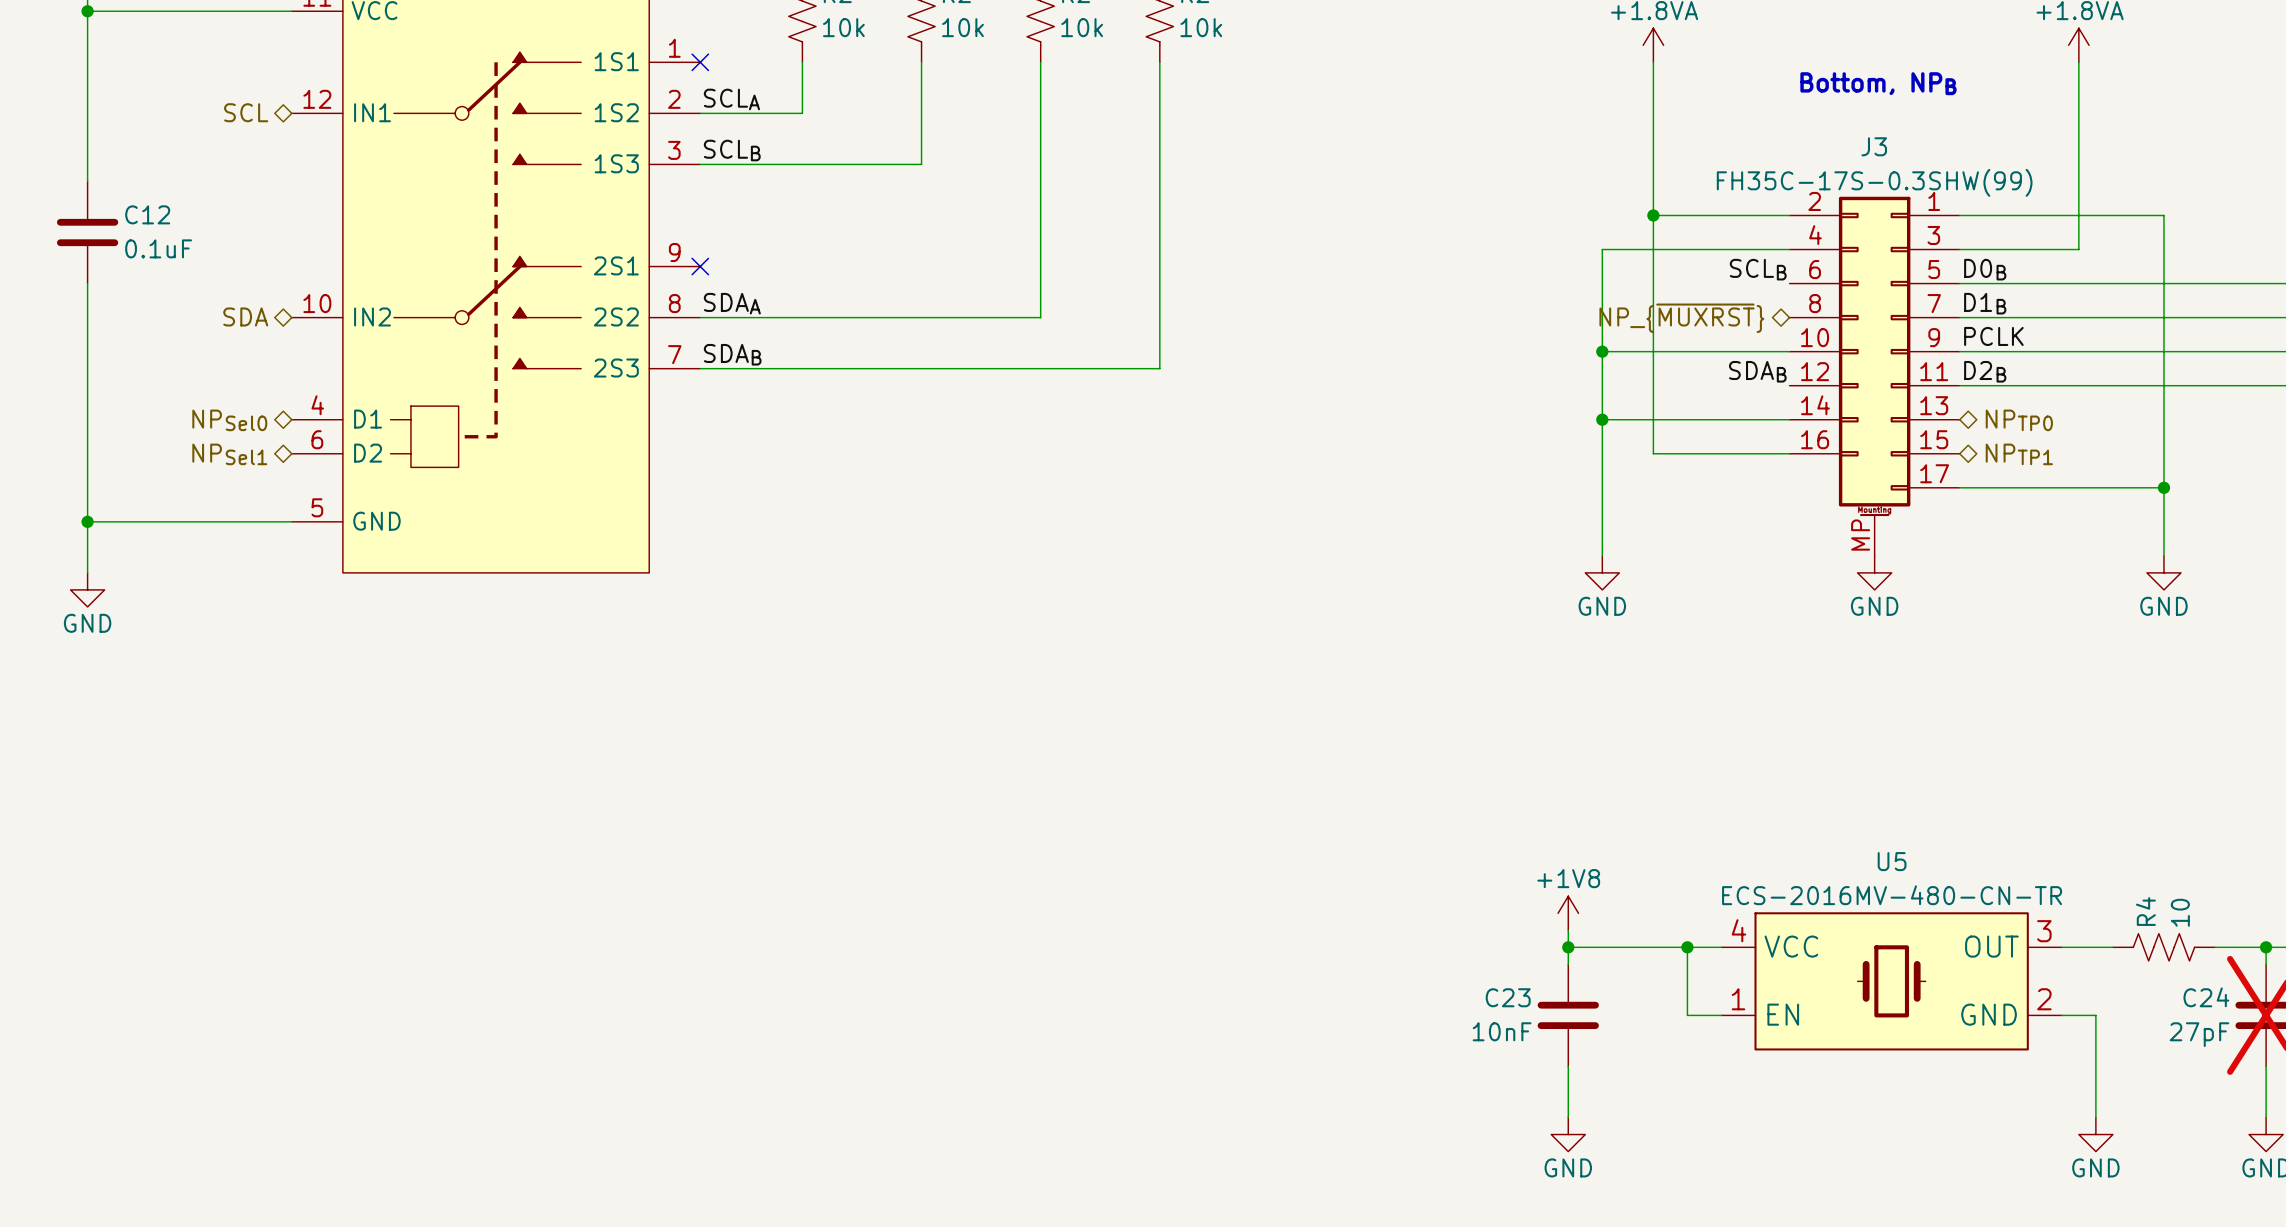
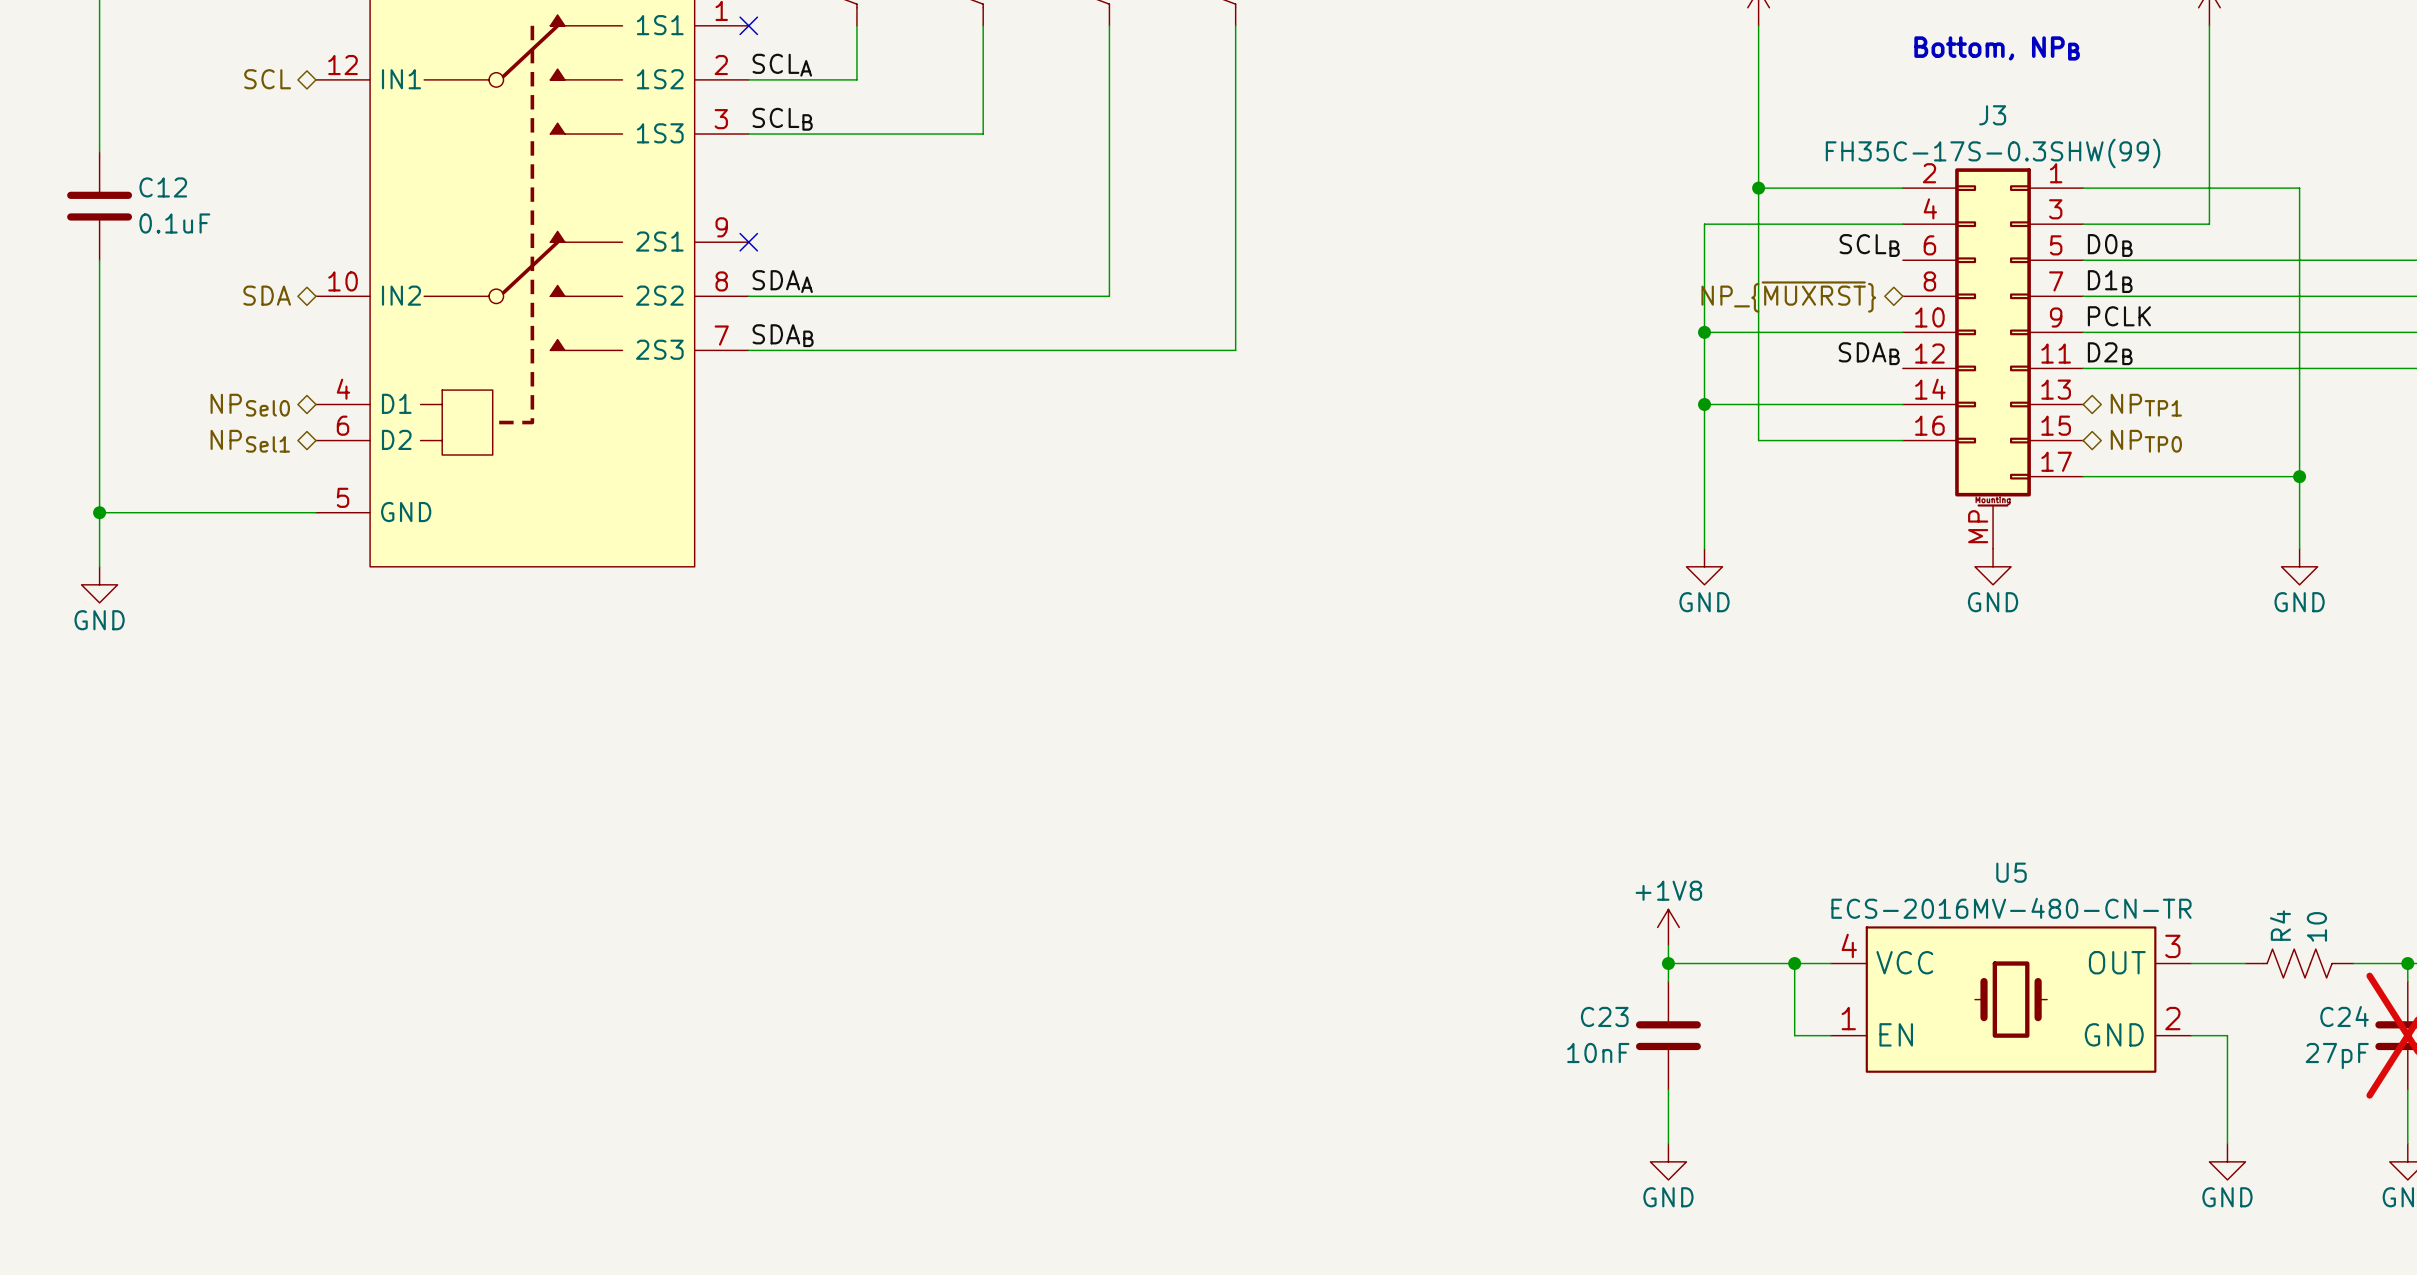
hierarchical label: NPTP0 (2019, 420) -> NPTP1 (2146, 405)
hierarchical label: NPTP1 (2019, 454) -> NPTP0 (2146, 441)

